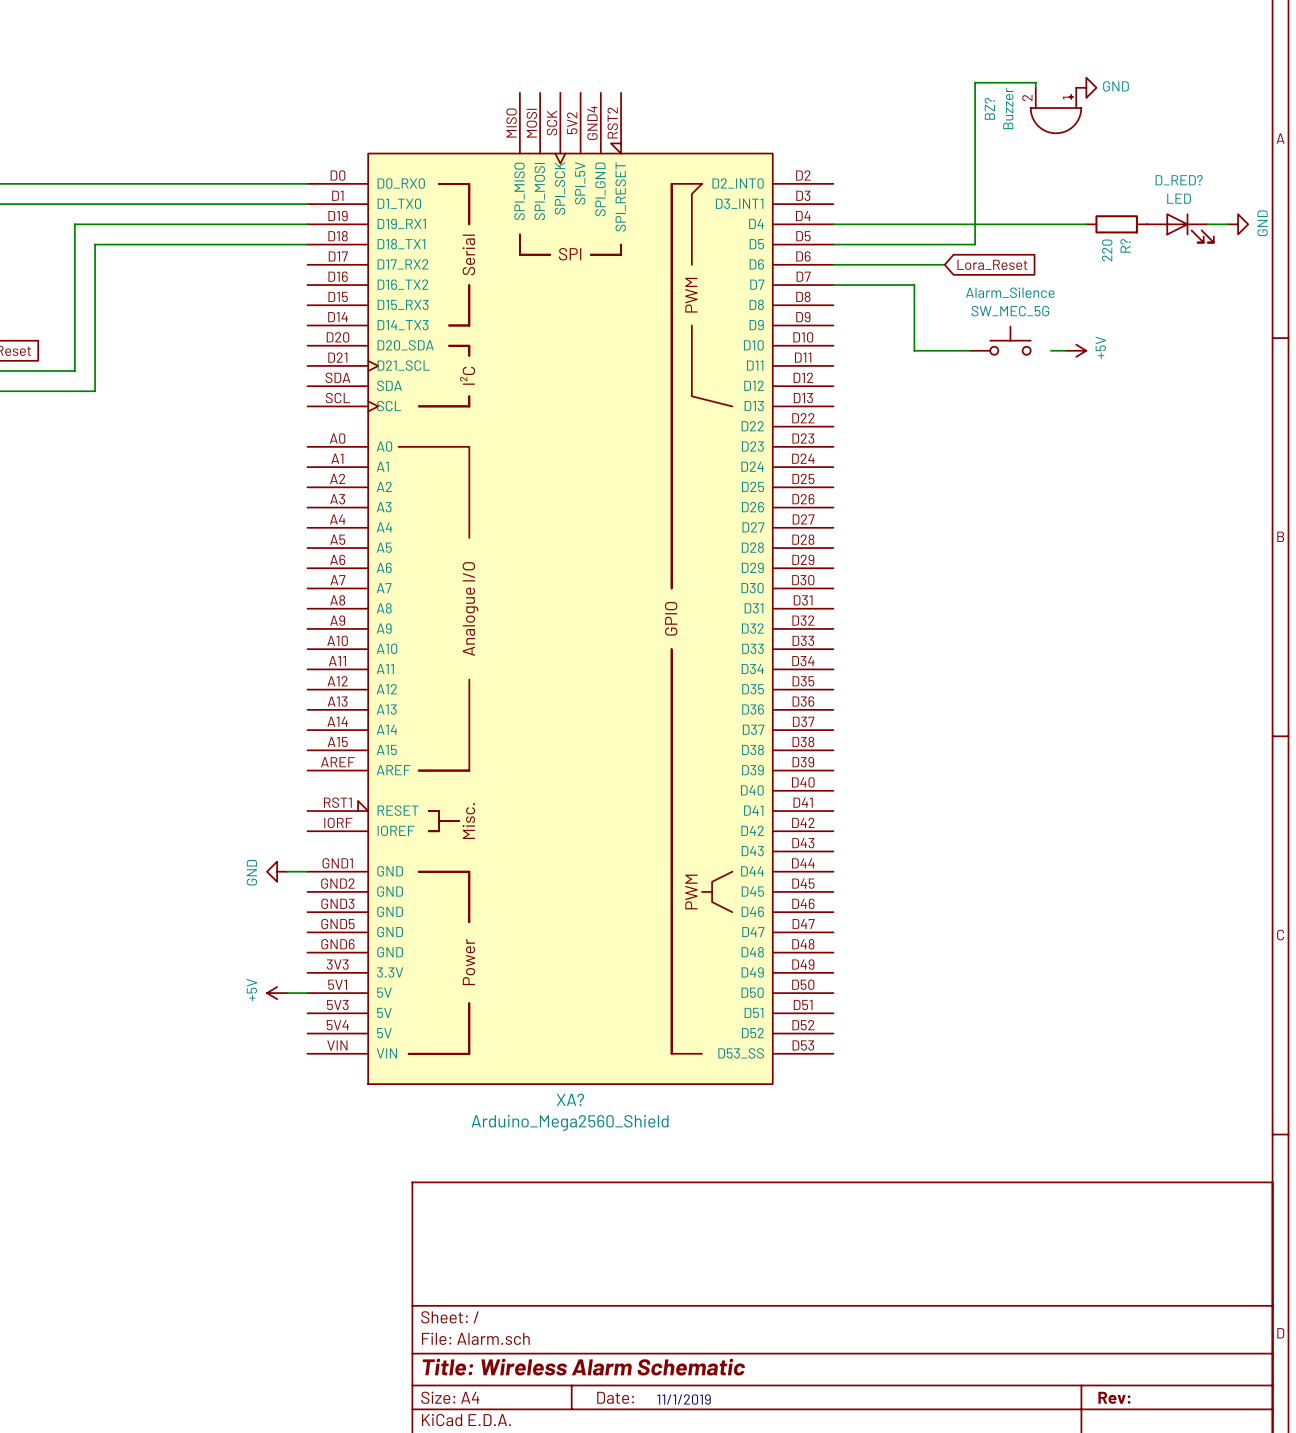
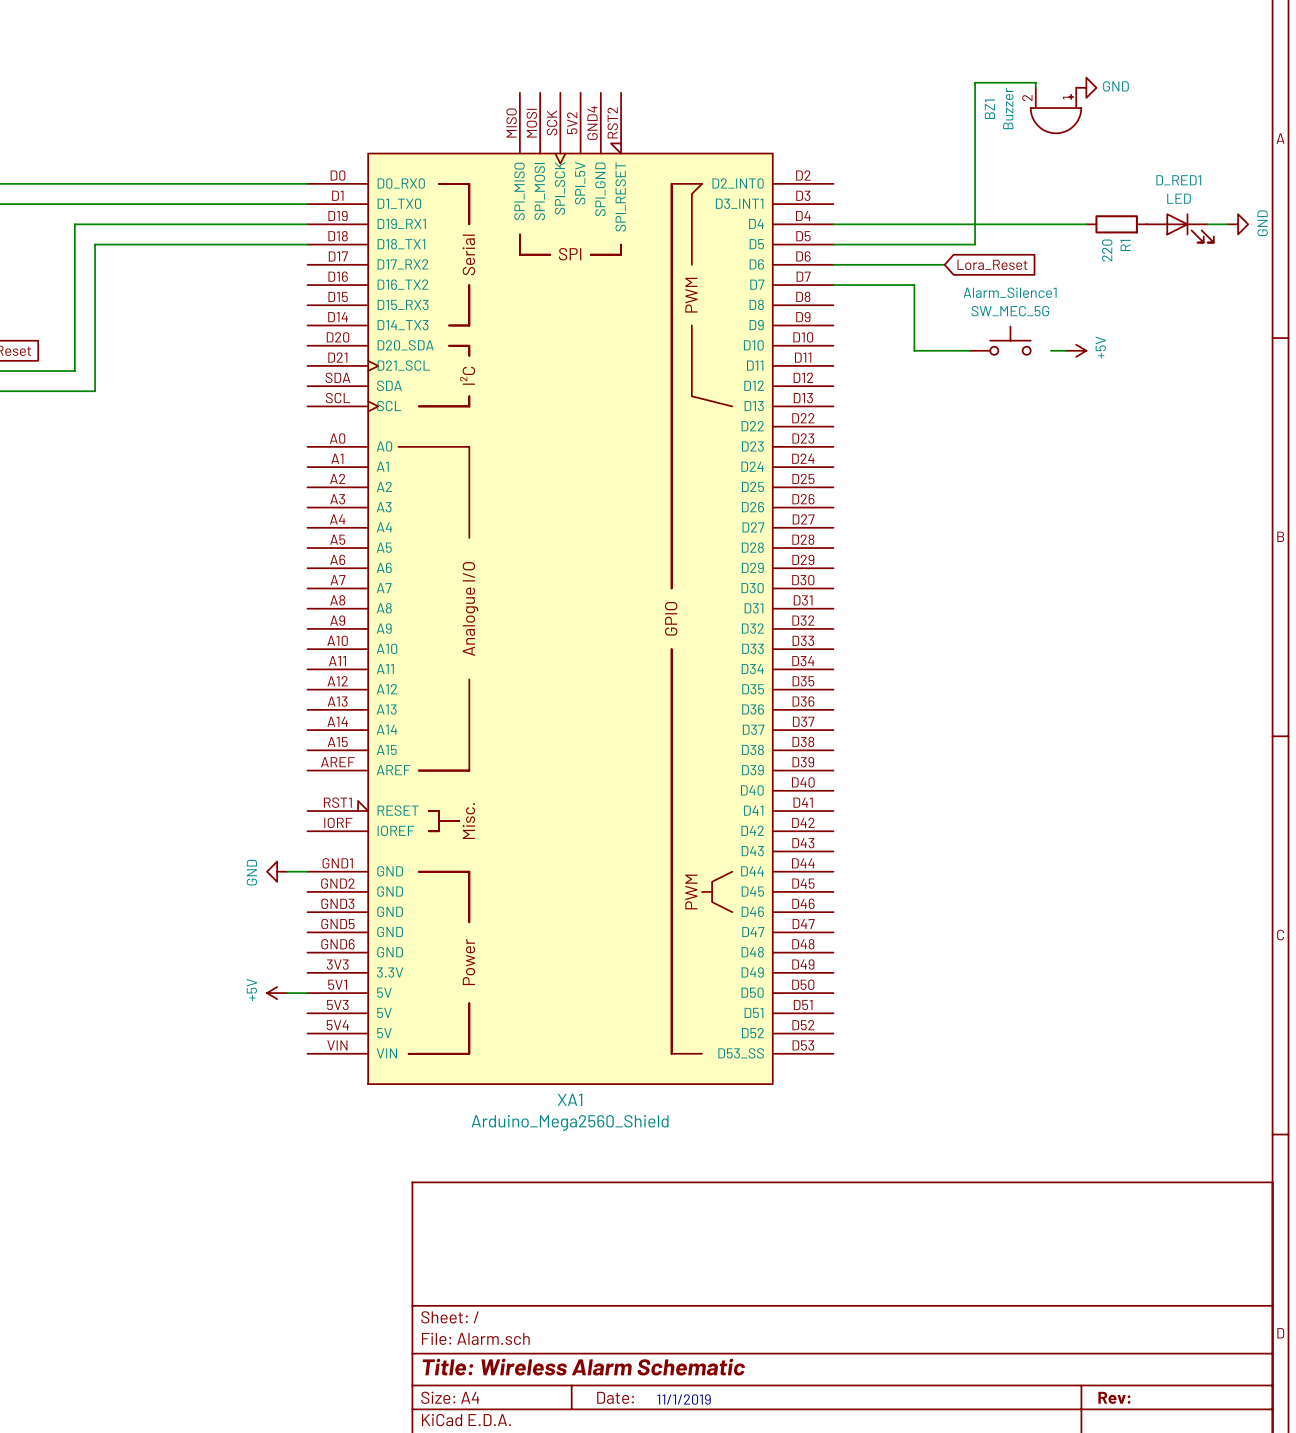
BZ? name: BZ? (989, 108) -> BZ1 (989, 109)
D_RED? name: D_RED? (1179, 180) -> D_RED1 (1178, 180)
R? name: R? (1125, 245) -> R1 (1125, 245)
Alarm_Silence name: Alarm_Silence (1010, 292) -> Alarm_Silence1 (1010, 292)
XA? name: XA? (570, 1099) -> XA1 (569, 1099)

